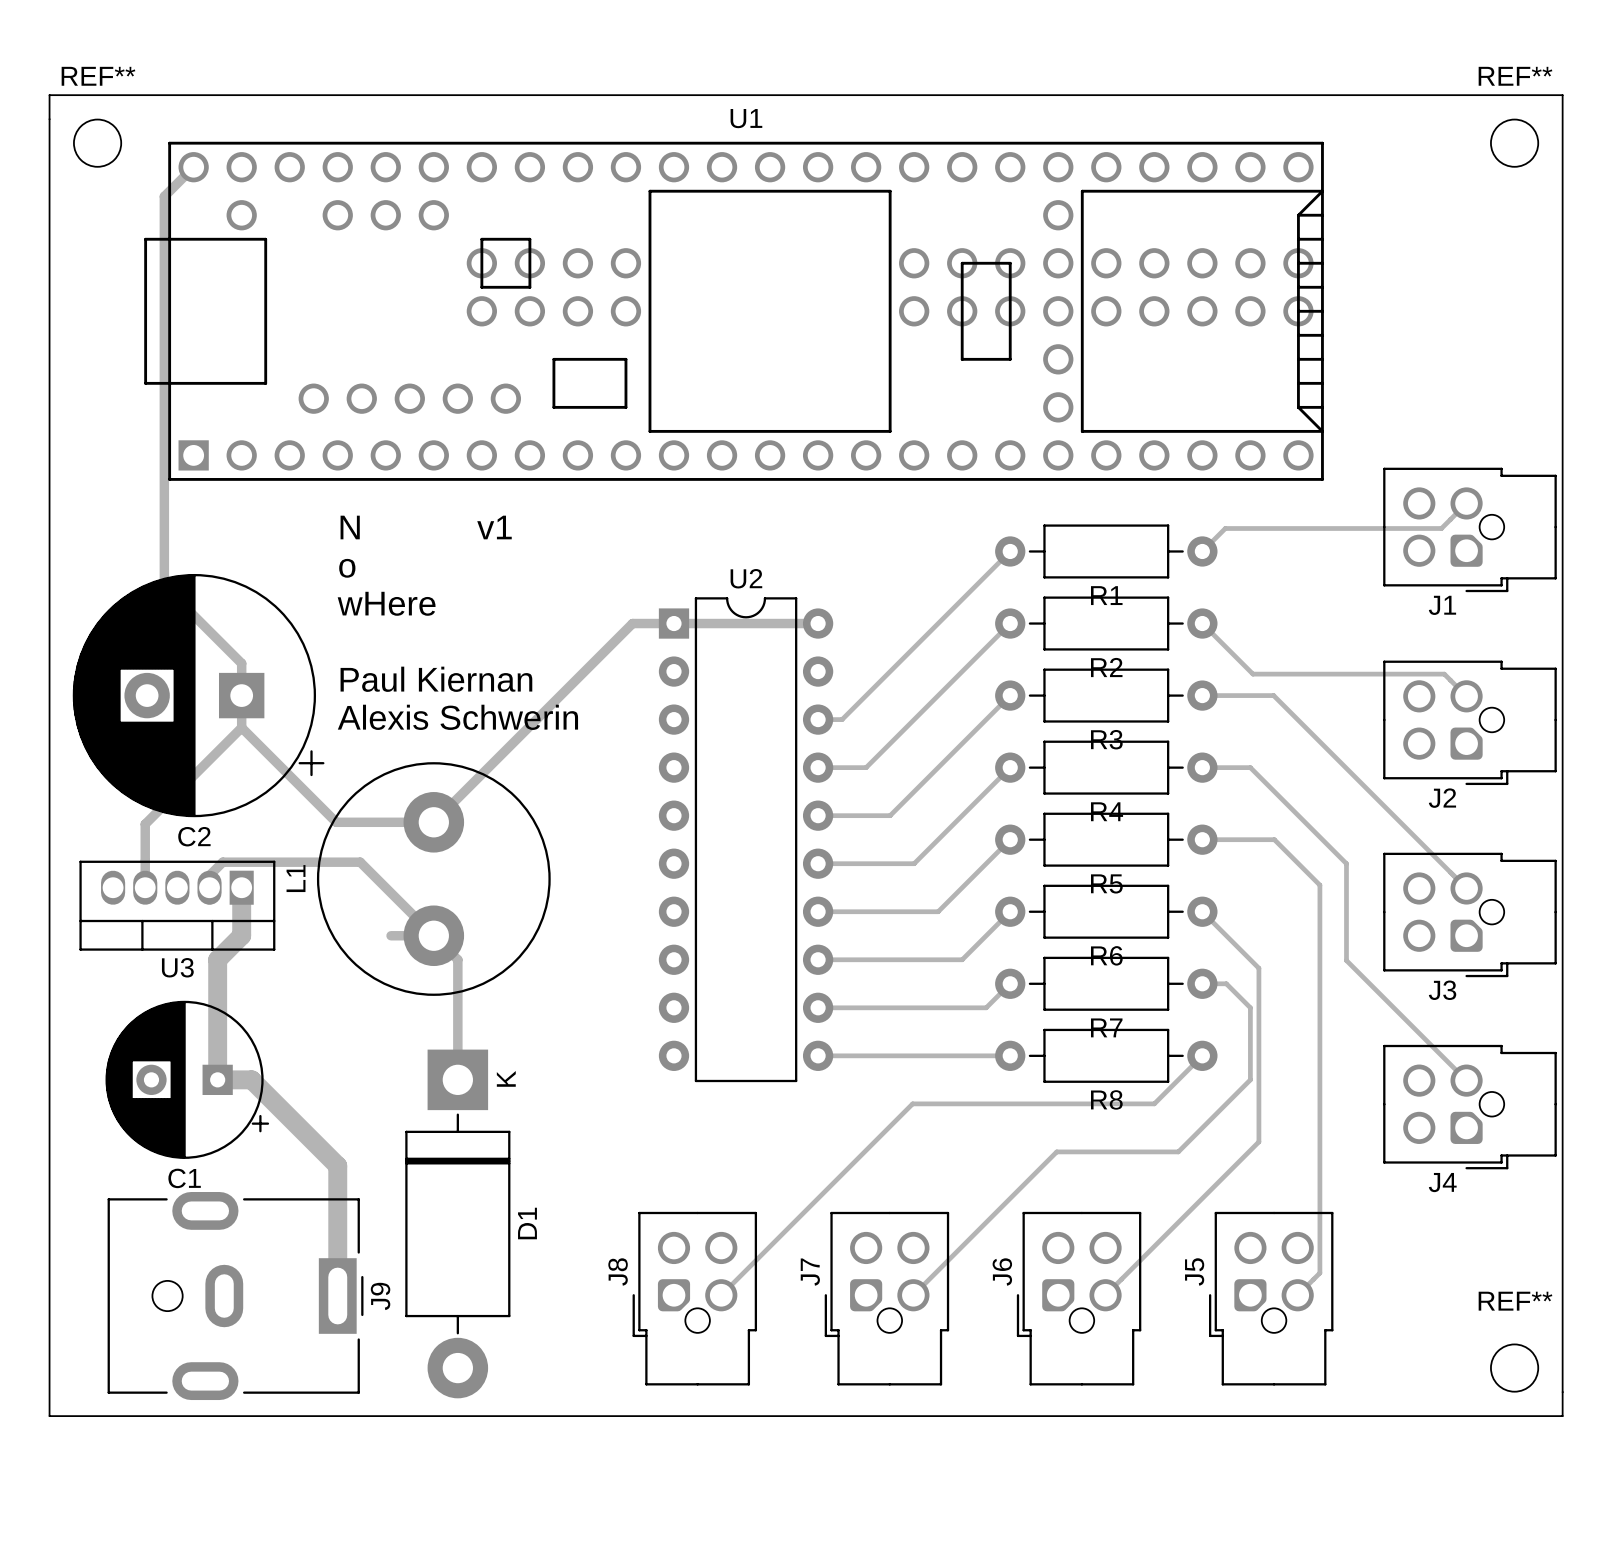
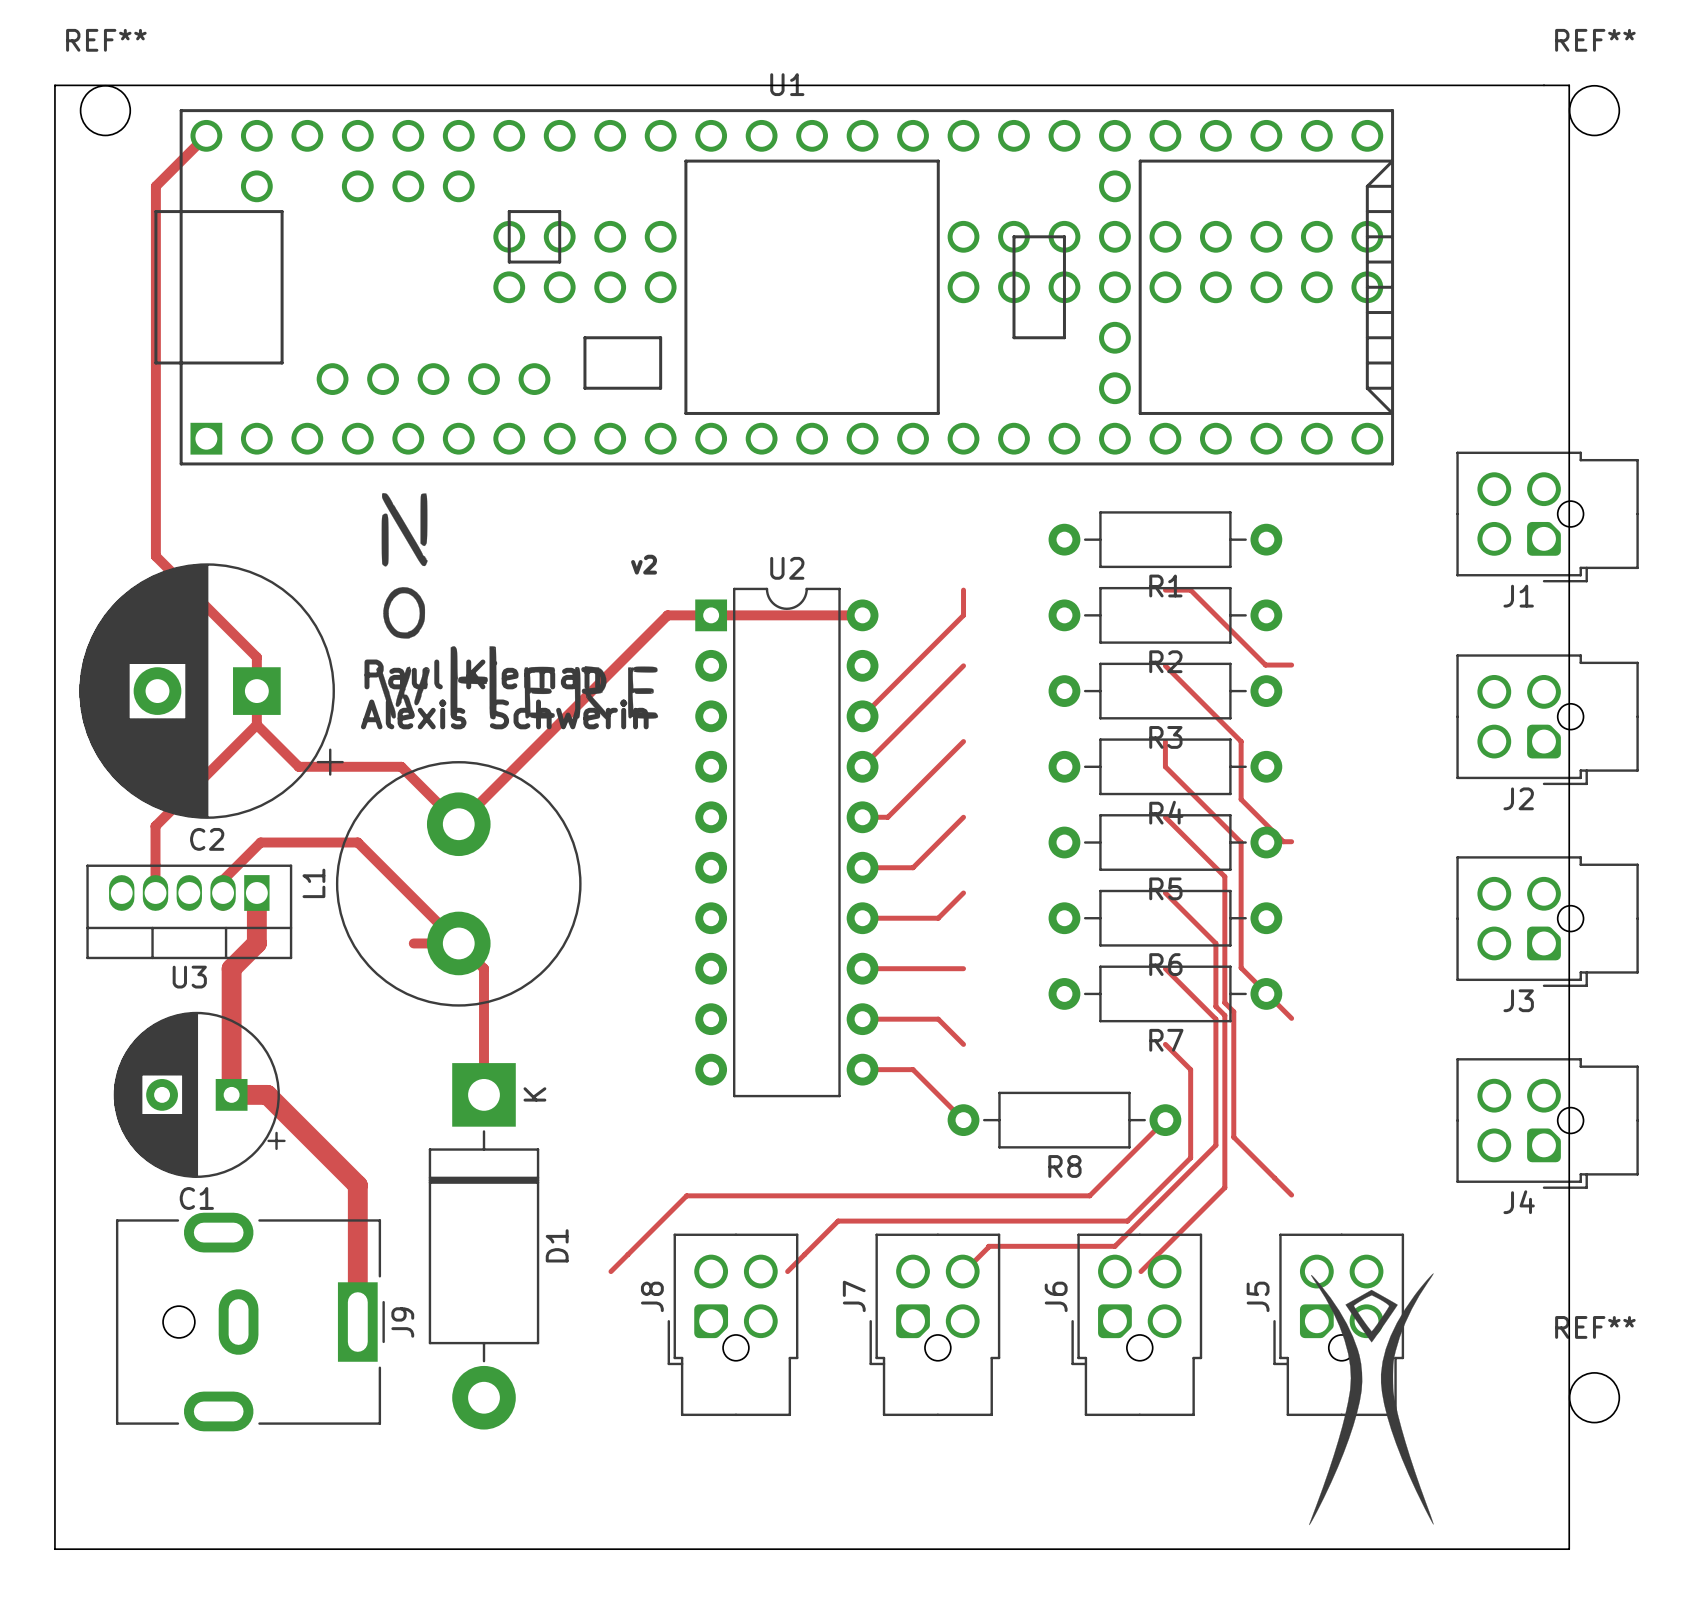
board edge: (49, 119) (49, 95) (1562, 95) (1562, 1416) (49, 1416) -> (54, 85) (1569, 85) (1569, 1549) (54, 1549) (54, 1448)
track: (164, 196) (164, 586) -> (175, 166) (155, 186) (155, 556) (175, 576)
track: (1466, 503) (1441, 528) (1225, 528) (1202, 551) -> none
drawing: none -> [376, 493, 659, 720]
text: N v1 (426, 527) -> none
track: (1010, 551) (842, 719) (818, 719) -> (963, 590) (963, 615) (862, 716)
text: o (347, 568) -> none
text: none -> v2 (644, 564)
track: none -> (1165, 590) (1190, 590) (1265, 665) (1291, 665)
text: wHere (386, 603) -> none
track: (1010, 623) (866, 767) (818, 767) -> (963, 665) (862, 766)
track: (1202, 623) (1252, 674) (1444, 674) (1466, 696) -> none
track: none -> (1165, 665) (1241, 741) (1241, 799) (1283, 841) (1291, 841)
track: (1010, 695) (890, 815) (842, 815) -> (963, 741) (887, 817)
track: (1202, 695) (1273, 695) (1466, 888) -> none
track: none -> (1165, 741) (1165, 766) (1241, 842) (1241, 967) (1291, 1018)
track: (281, 767) (336, 822) (433, 822) -> (298, 766) (401, 766) (458, 824)
track: (1010, 767) (914, 863) (866, 863) -> (963, 817) (913, 867)
track: (1202, 767) (1250, 767) (1346, 863) (1346, 960) (1466, 1080) -> none
track: none -> (1165, 817) (1224, 876) (1224, 1002) (1233, 1011) (1233, 1137) (1291, 1195)
track: (1010, 839) (938, 911) (890, 911) -> (963, 892) (938, 918)
track: (1202, 839) (1274, 839) (1319, 885) (1319, 1273) (1297, 1295) -> none
track: (222, 862) (360, 862) -> (237, 866) (260, 842) (357, 842) (381, 866)
track: none -> (1165, 892) (1215, 943) (1215, 1006) (1224, 1015) (1224, 1187) (1140, 1271)
track: (1010, 911) (962, 959) (914, 959) -> none
track: (1202, 911) (1258, 968) (1258, 1141) (1105, 1295) -> none
track: none -> (1165, 968) (1215, 1019) (1215, 1145) (1114, 1246) (988, 1246) (964, 1271)
track: (1010, 983) (986, 1007) (890, 1007) -> (963, 1044) (938, 1019)
track: (1202, 983) (1226, 983) (1250, 1007) (1250, 1079) (1178, 1151) (1056, 1151) (913, 1295) -> none
track: none -> (1165, 1044) (1190, 1069) (1190, 1157) (1127, 1221) (838, 1221) (787, 1271)
track: (866, 1055) (1010, 1055) -> (913, 1069) (963, 1120)
R8 position: (1106, 1055) -> (1064, 1120)
track: (1202, 1055) (1154, 1103) (912, 1103) (721, 1295) -> none
track: none -> (1165, 1120) (1089, 1195) (686, 1195) (610, 1271)
drawing: none -> [1309, 1273, 1434, 1526]

